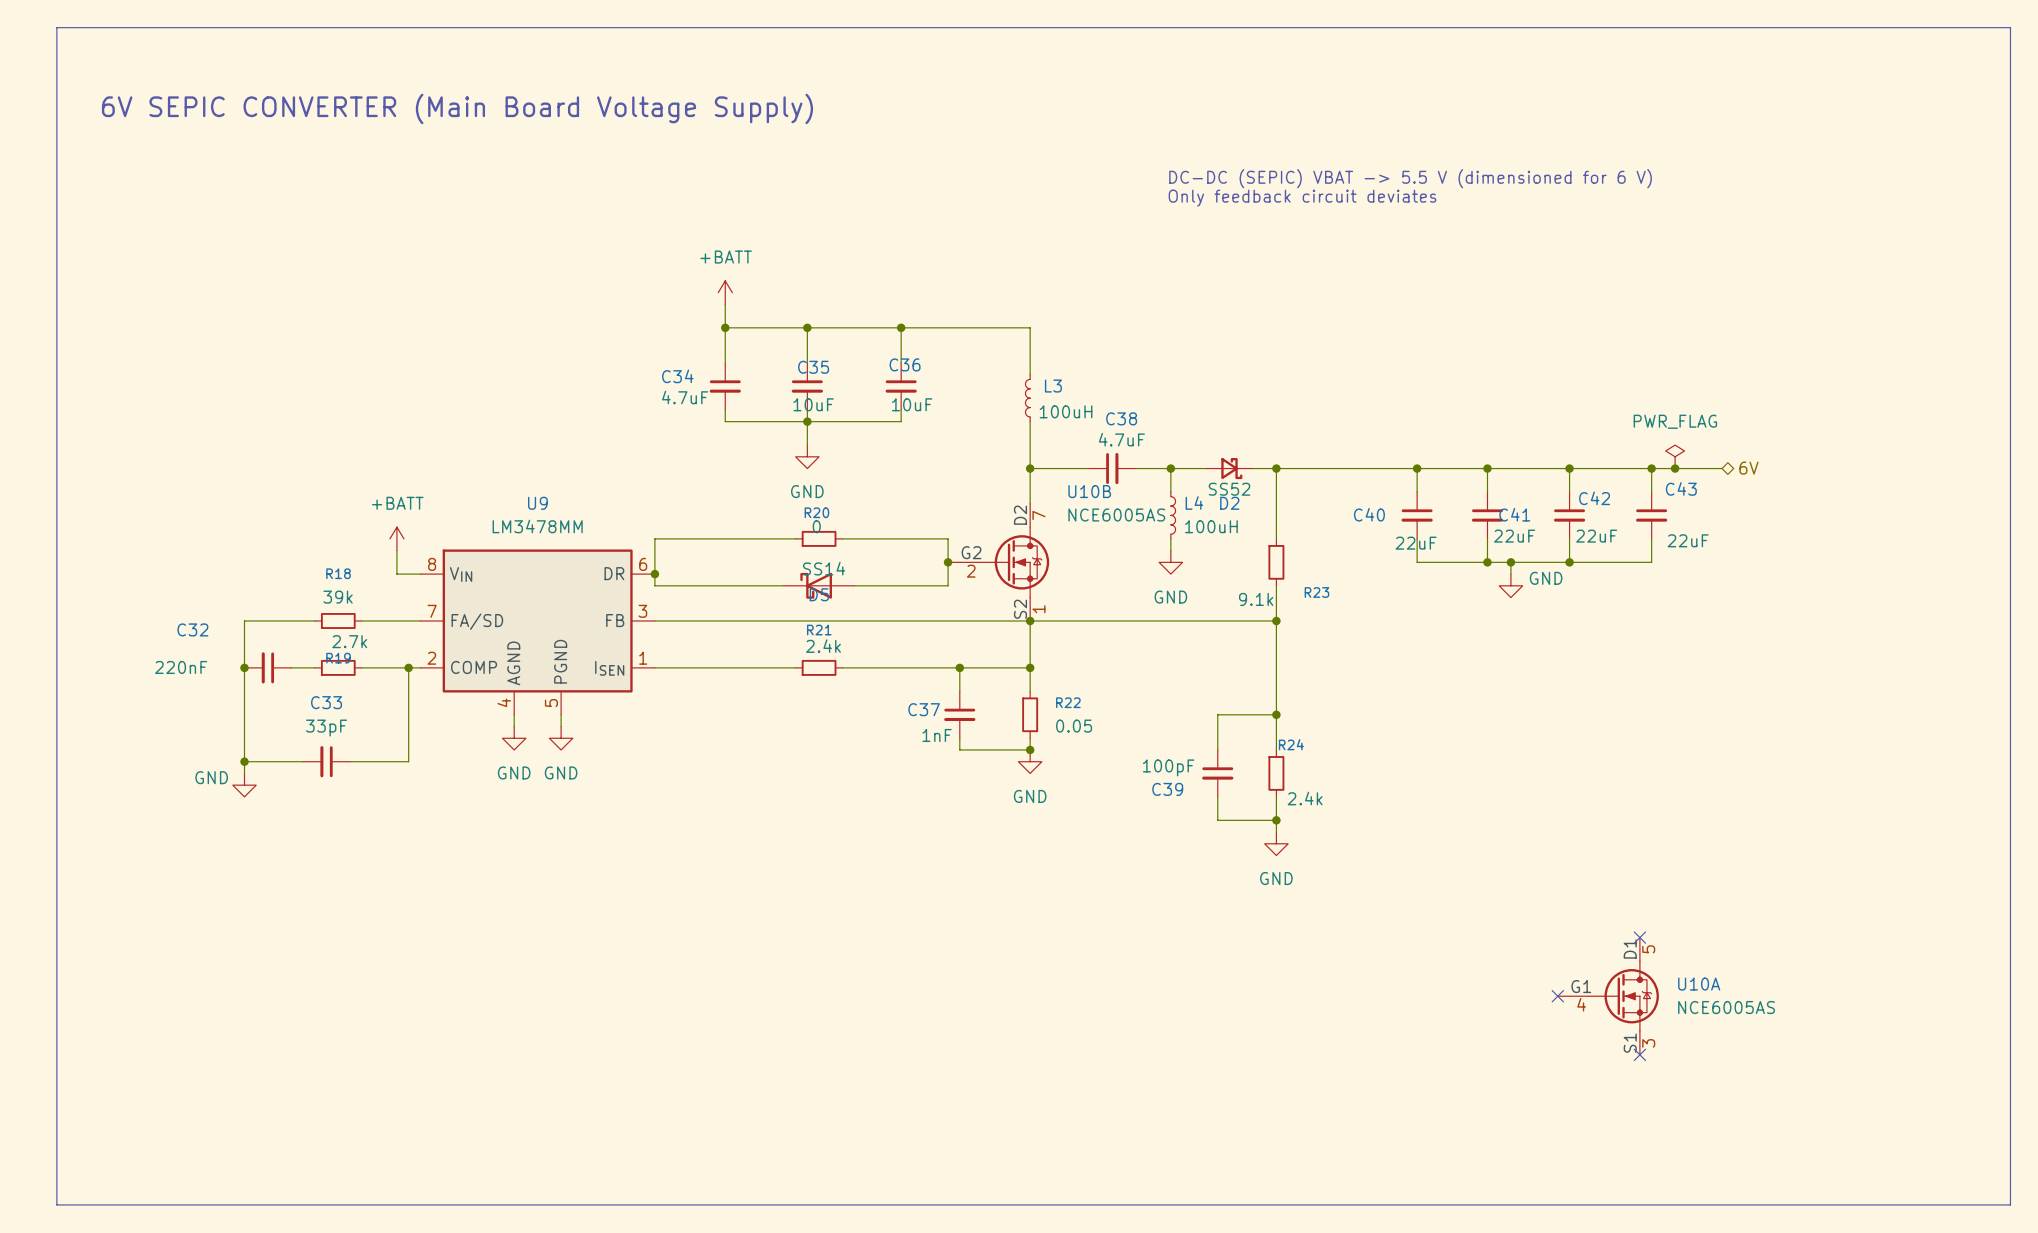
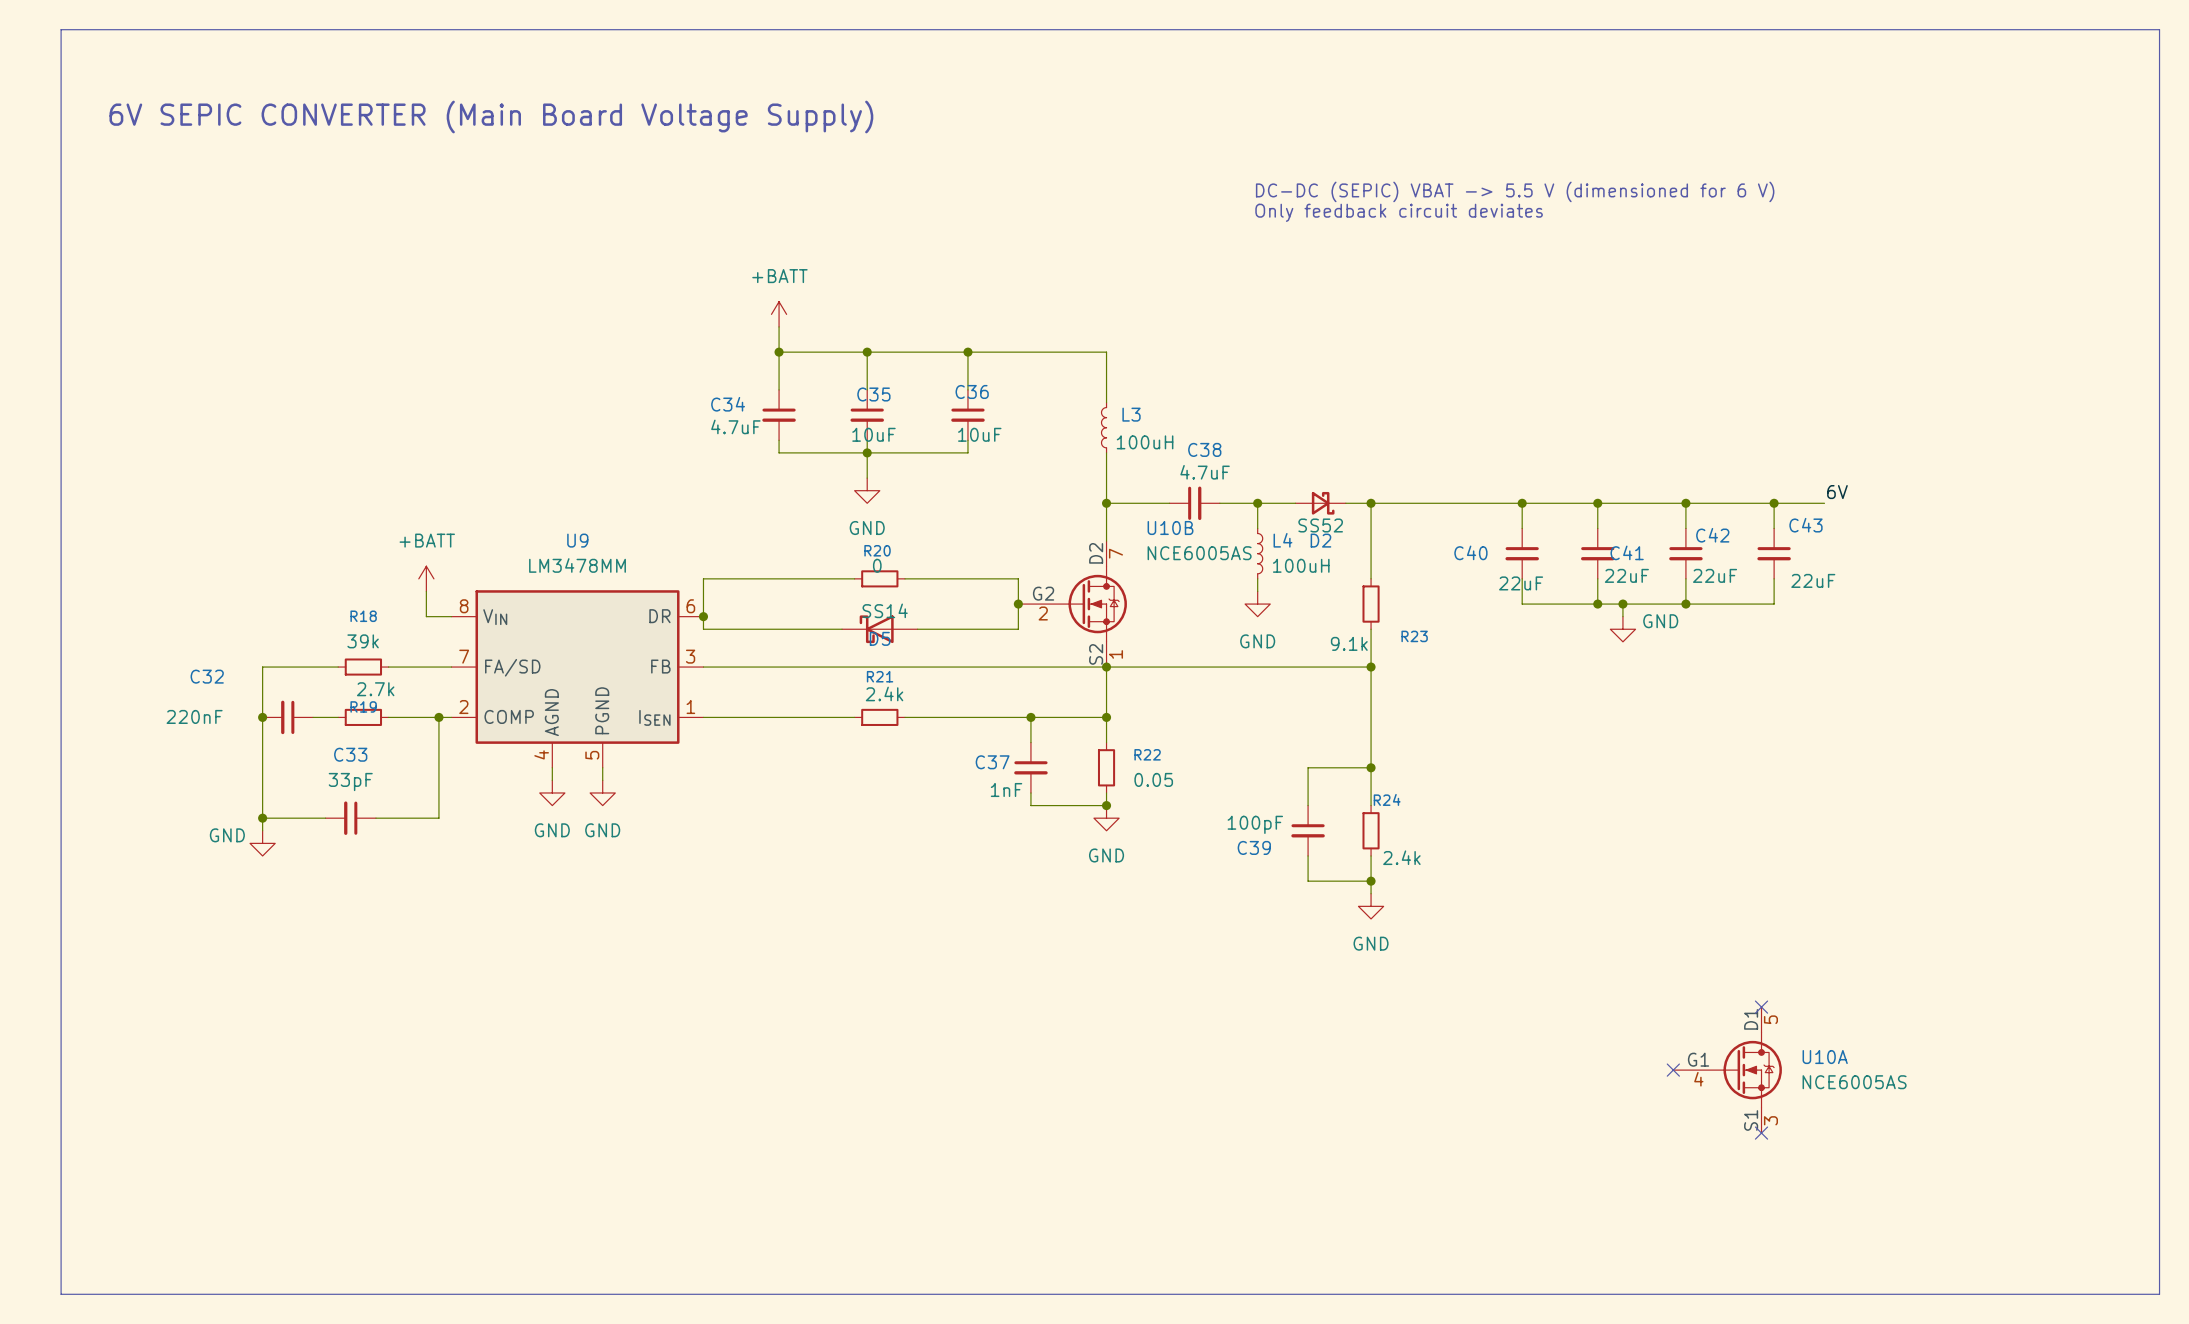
power symbol: PWR_FLAG (1675, 456) -> none
label: none -> 6V (1837, 492)
junction: (1675, 468) -> none
wire: (1698, 468) (1722, 468) -> none
hierarchical label: 6V (1748, 468) -> none

